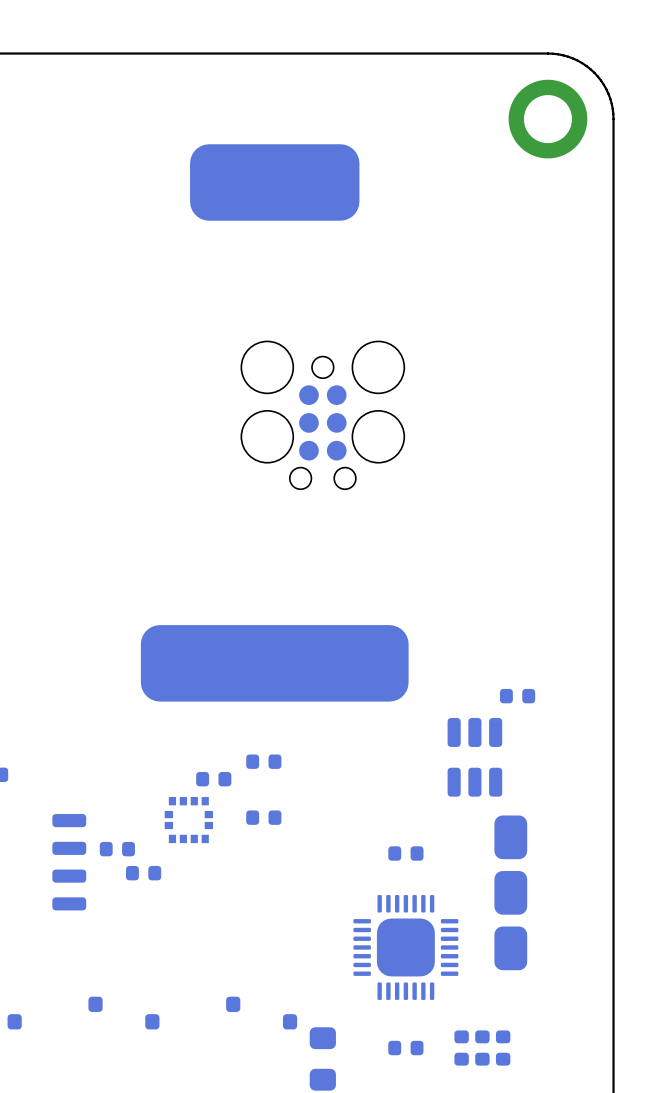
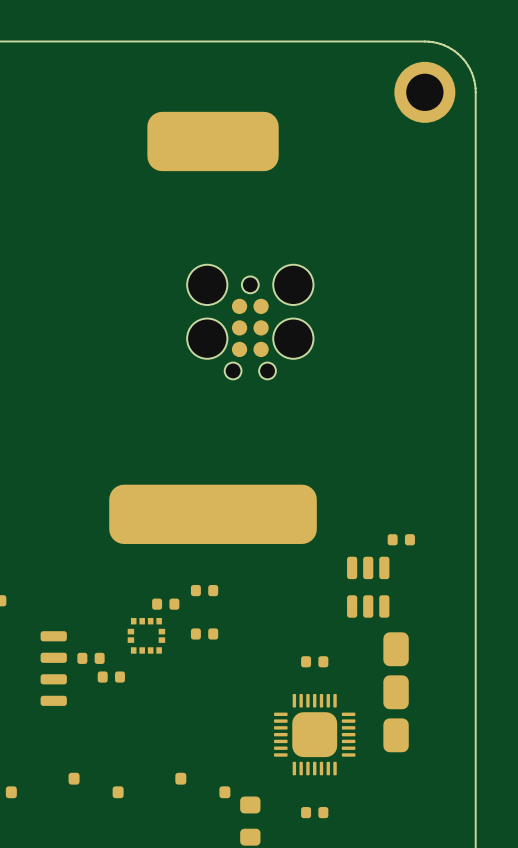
part: (461, 1048) -> none
part: (482, 1048) -> none
part: (503, 1048) -> none

